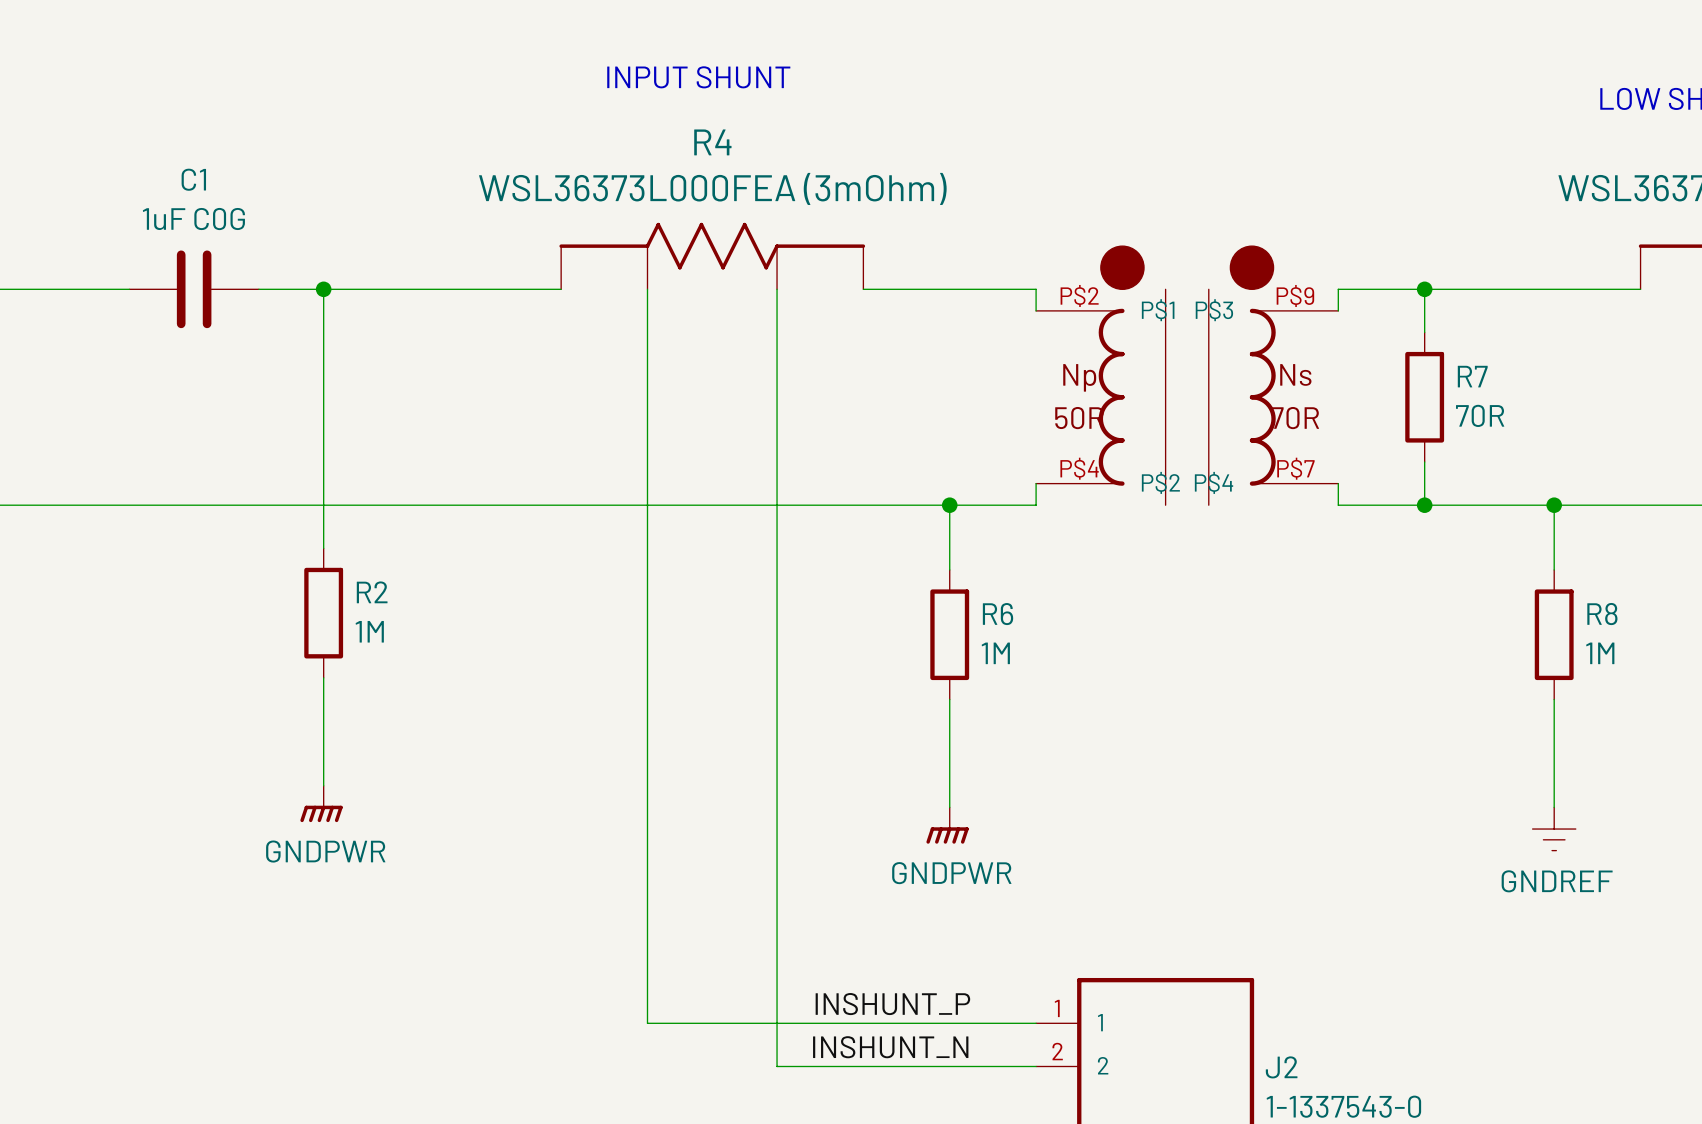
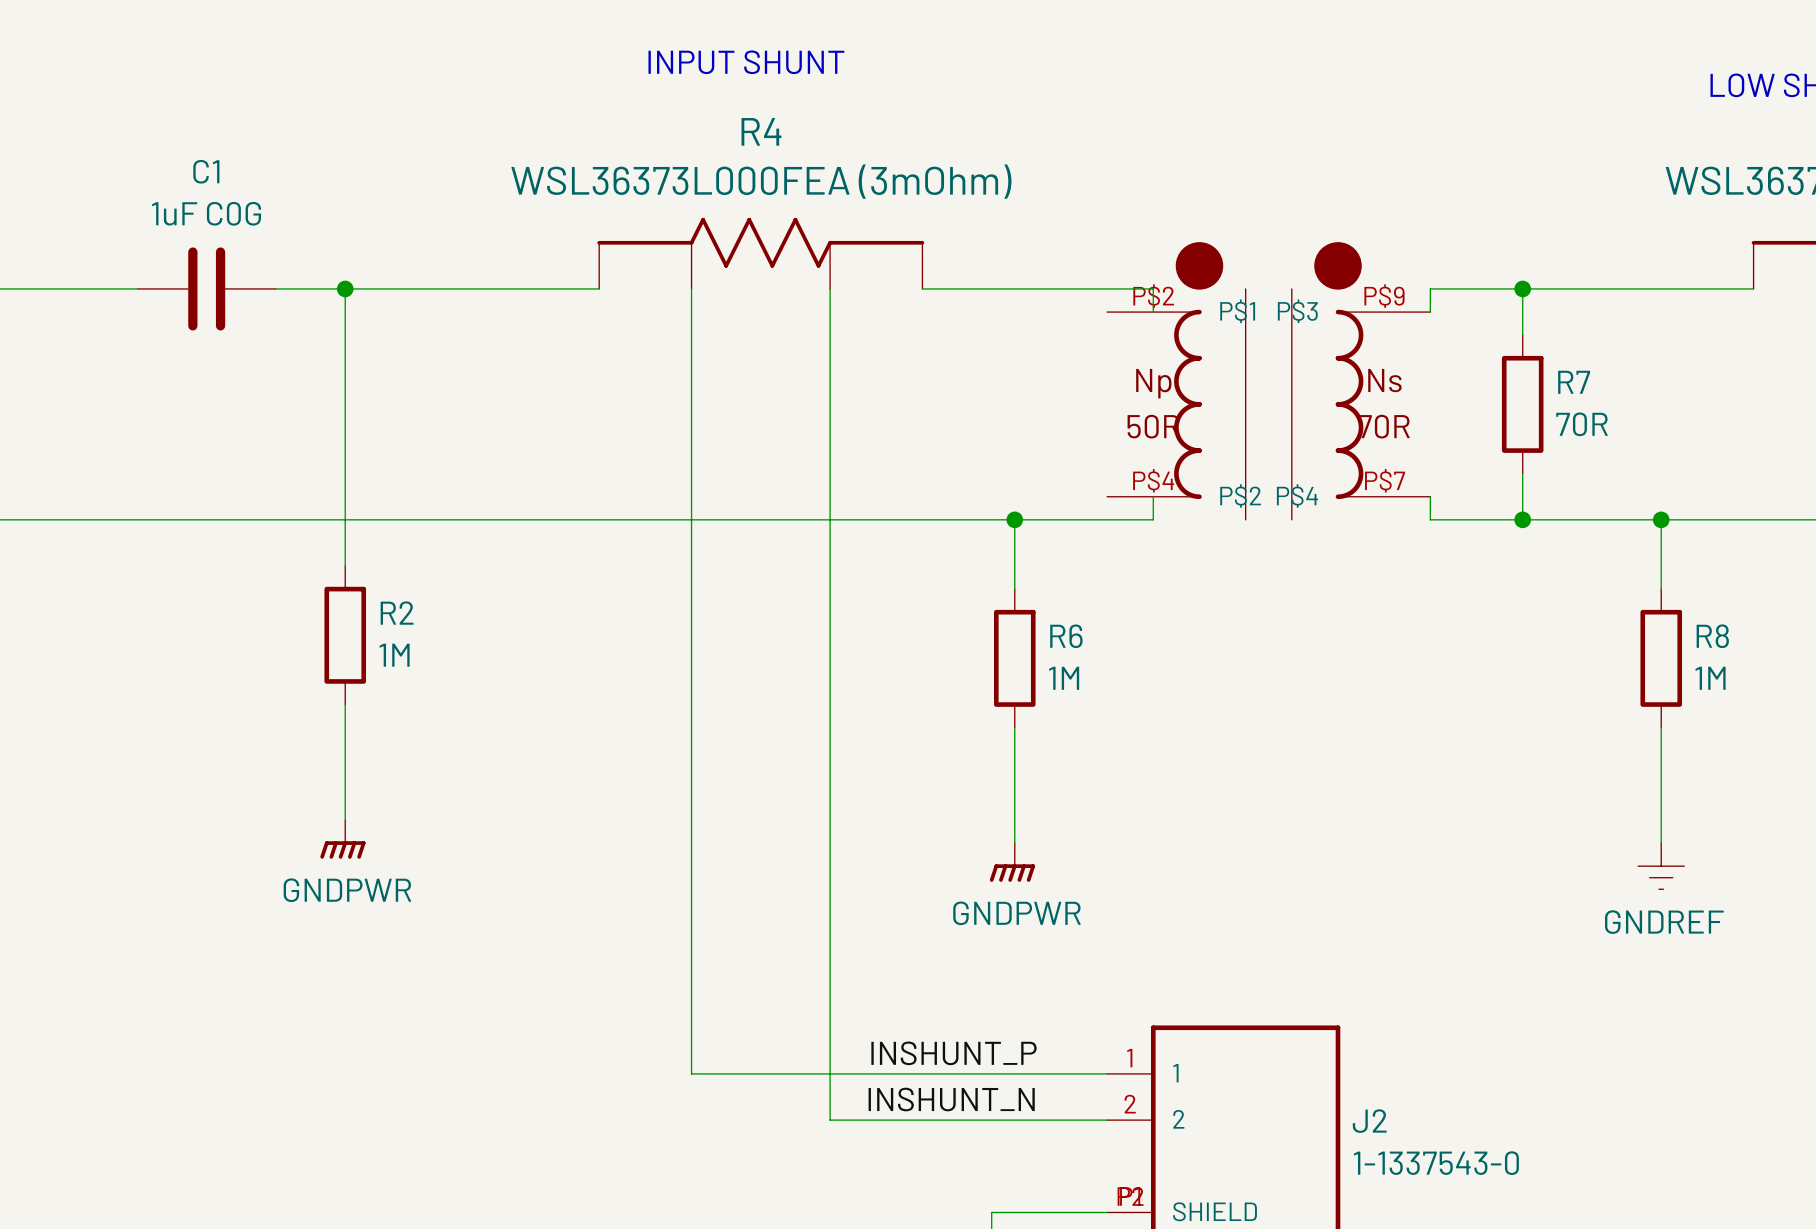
wire: (1036, 289) (1036, 310) -> (1107, 288) (1153, 288) (1153, 312)
wire: (1036, 483) (1036, 505) -> (1153, 496) (1153, 519) (1107, 519)

